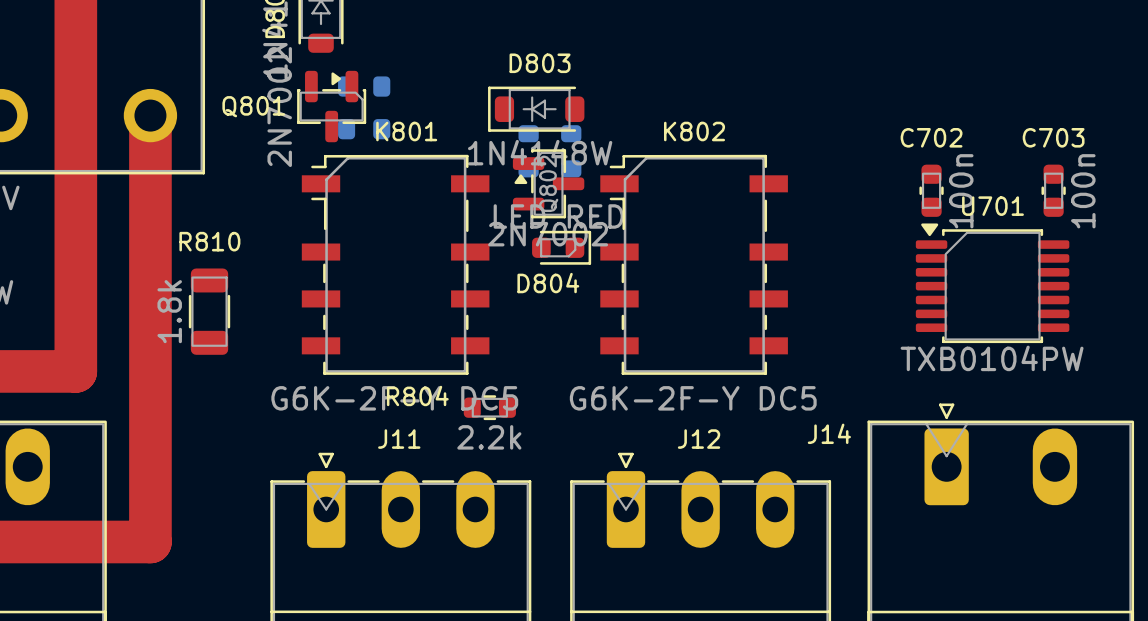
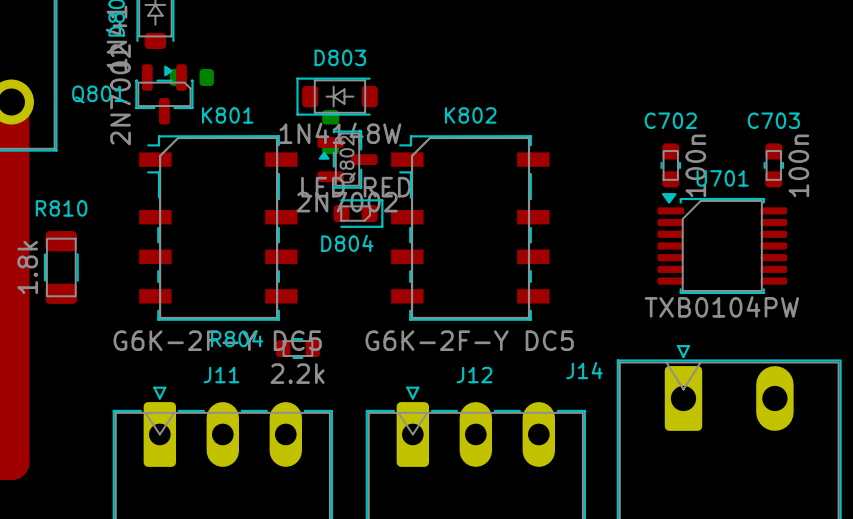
part: (364, 129) -> none
part: (571, 151) -> none

